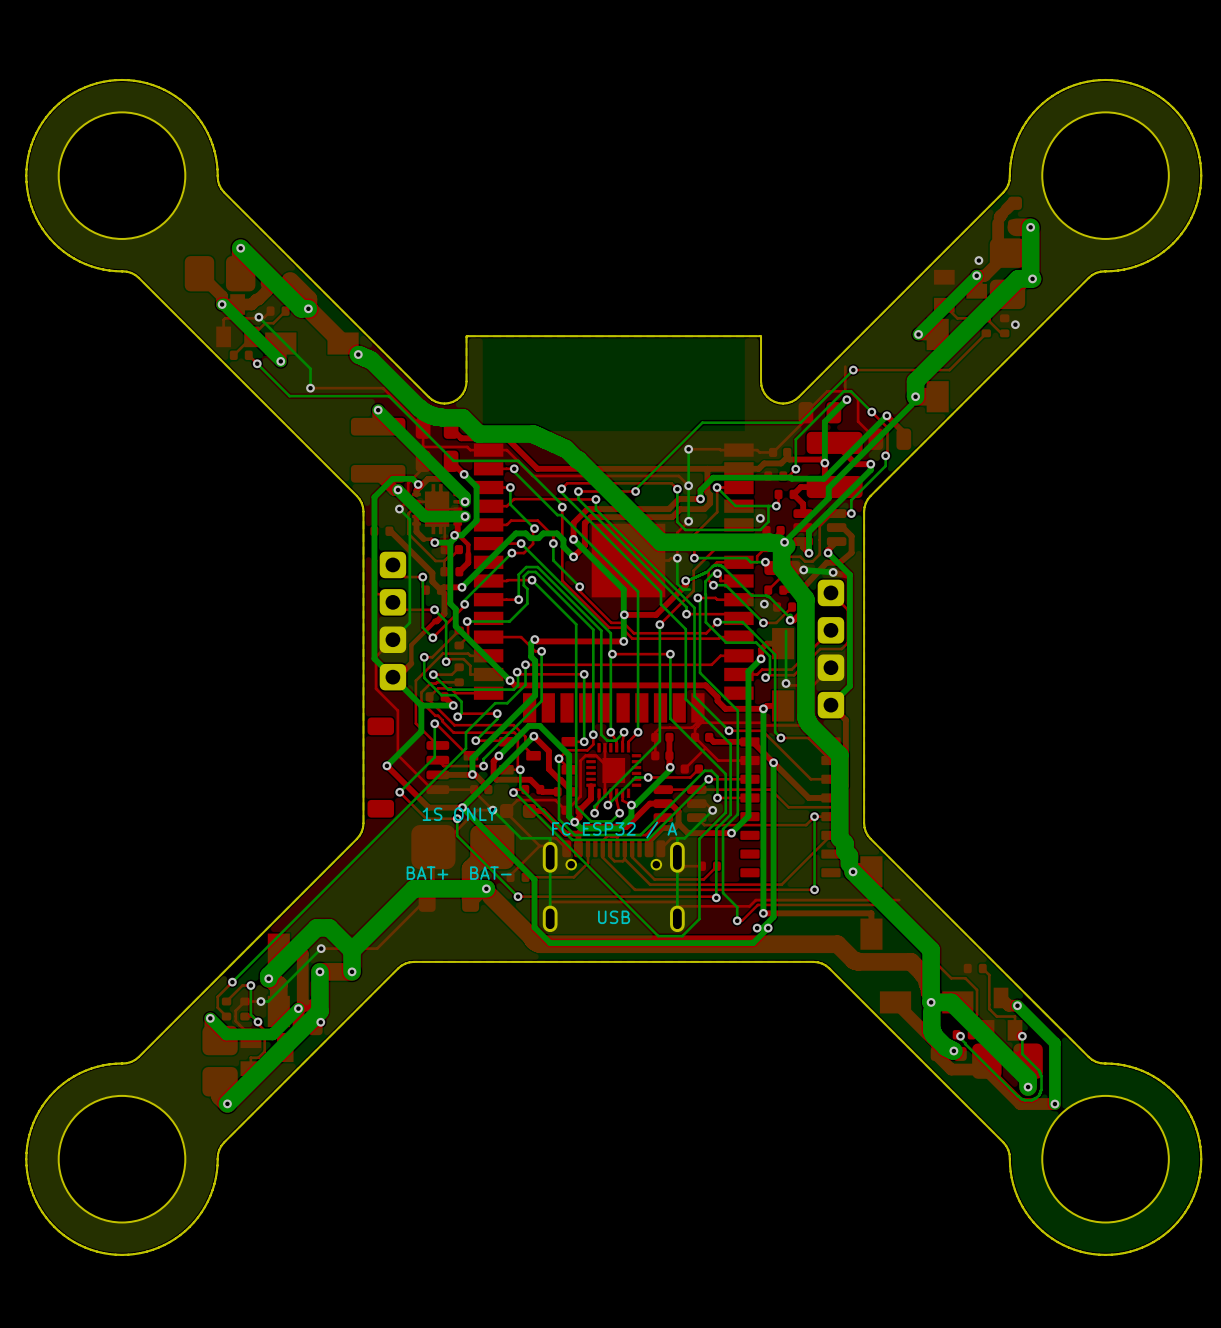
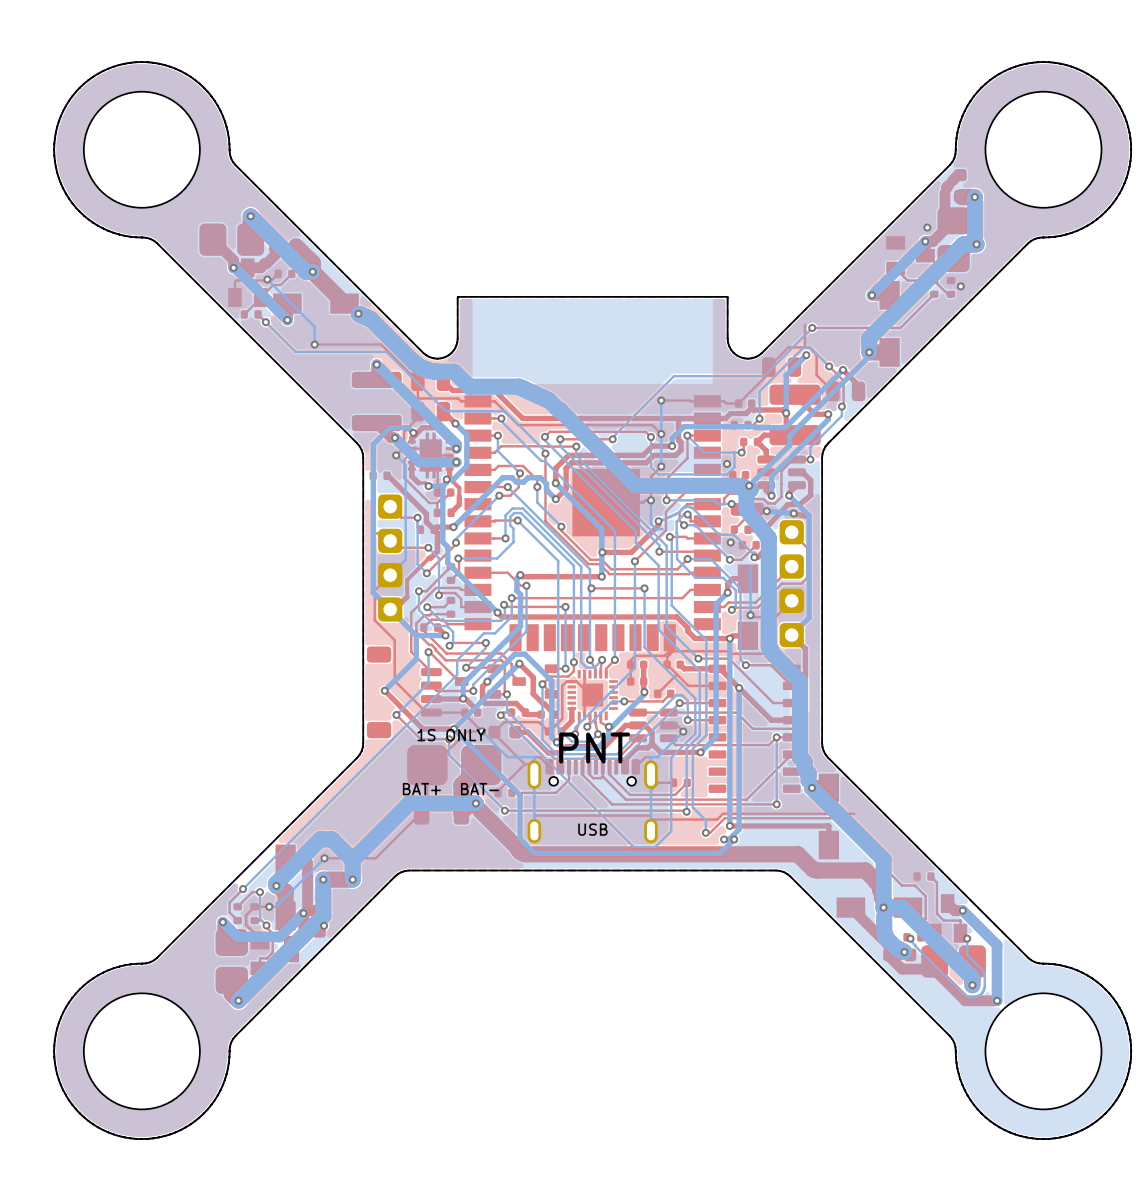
text: FC ESP32 / A (614, 830) -> PNT (594, 748)

